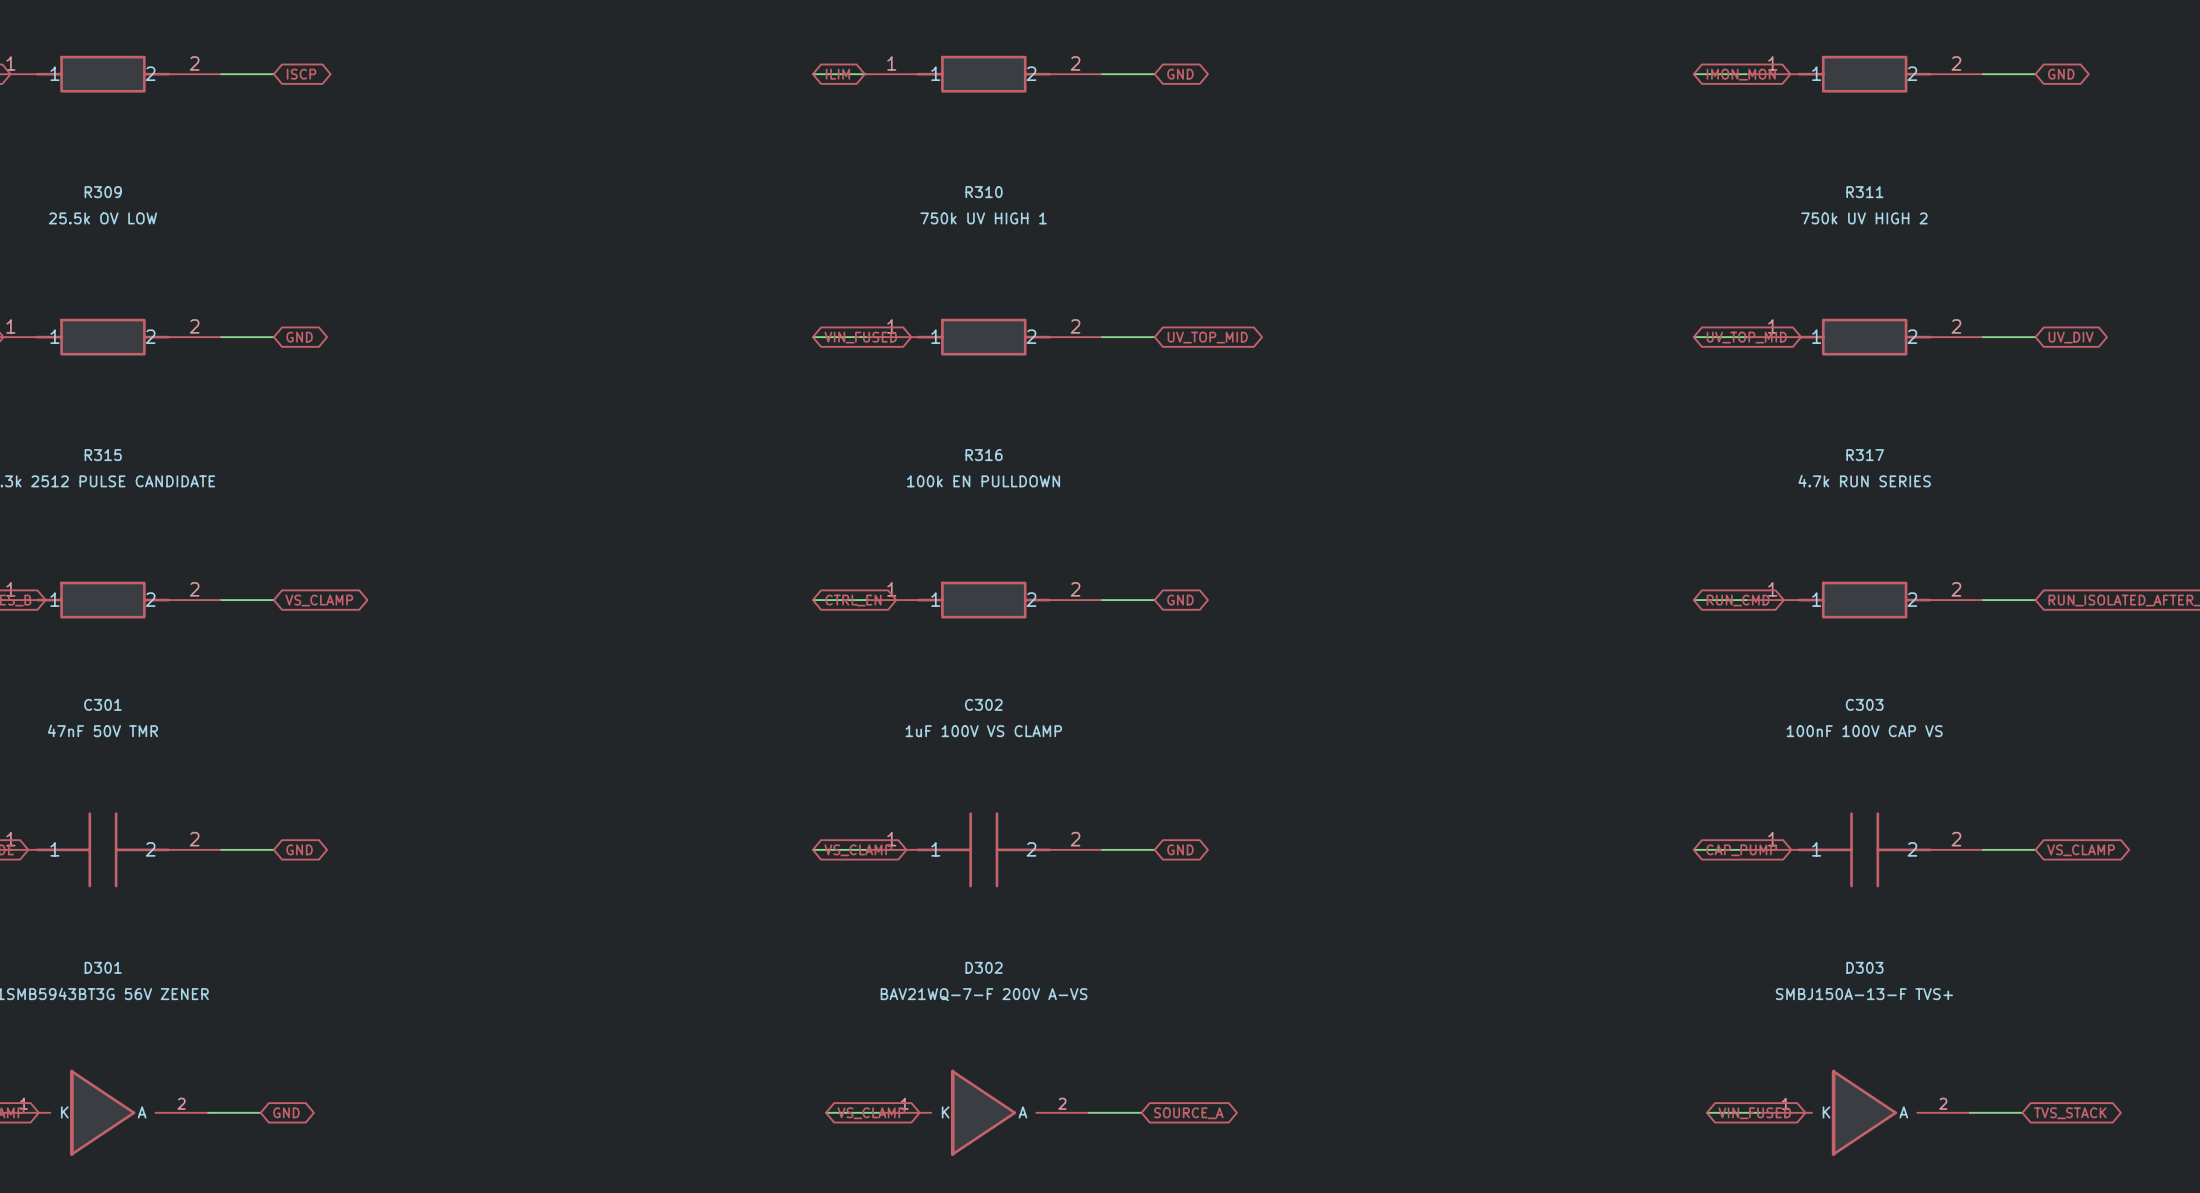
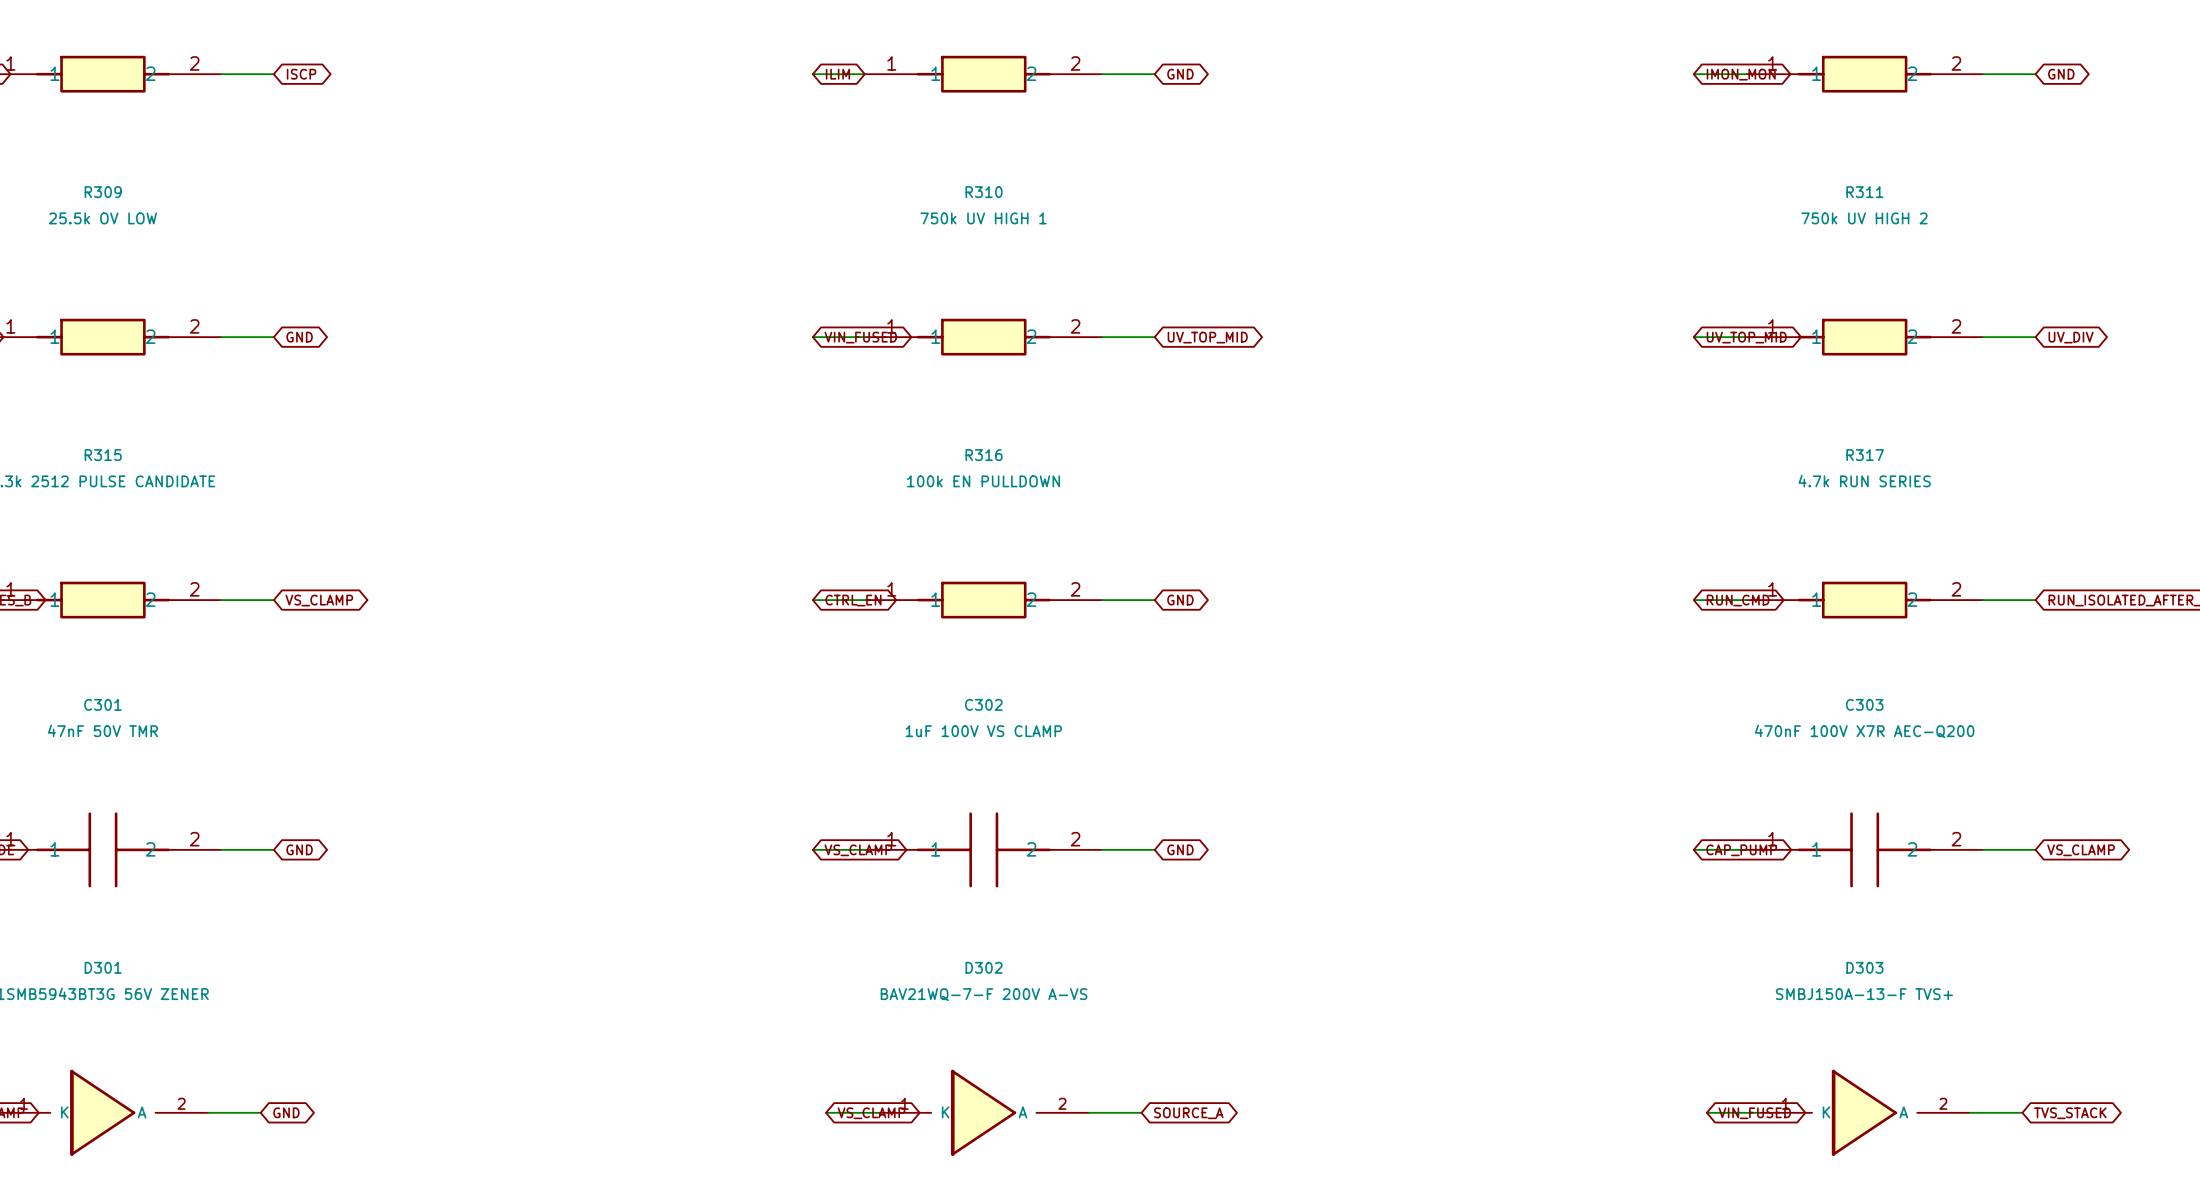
C303 value: 100nF 100V CAP VS (1864, 731) -> 470nF 100V X7R AEC-Q200 (1864, 731)

